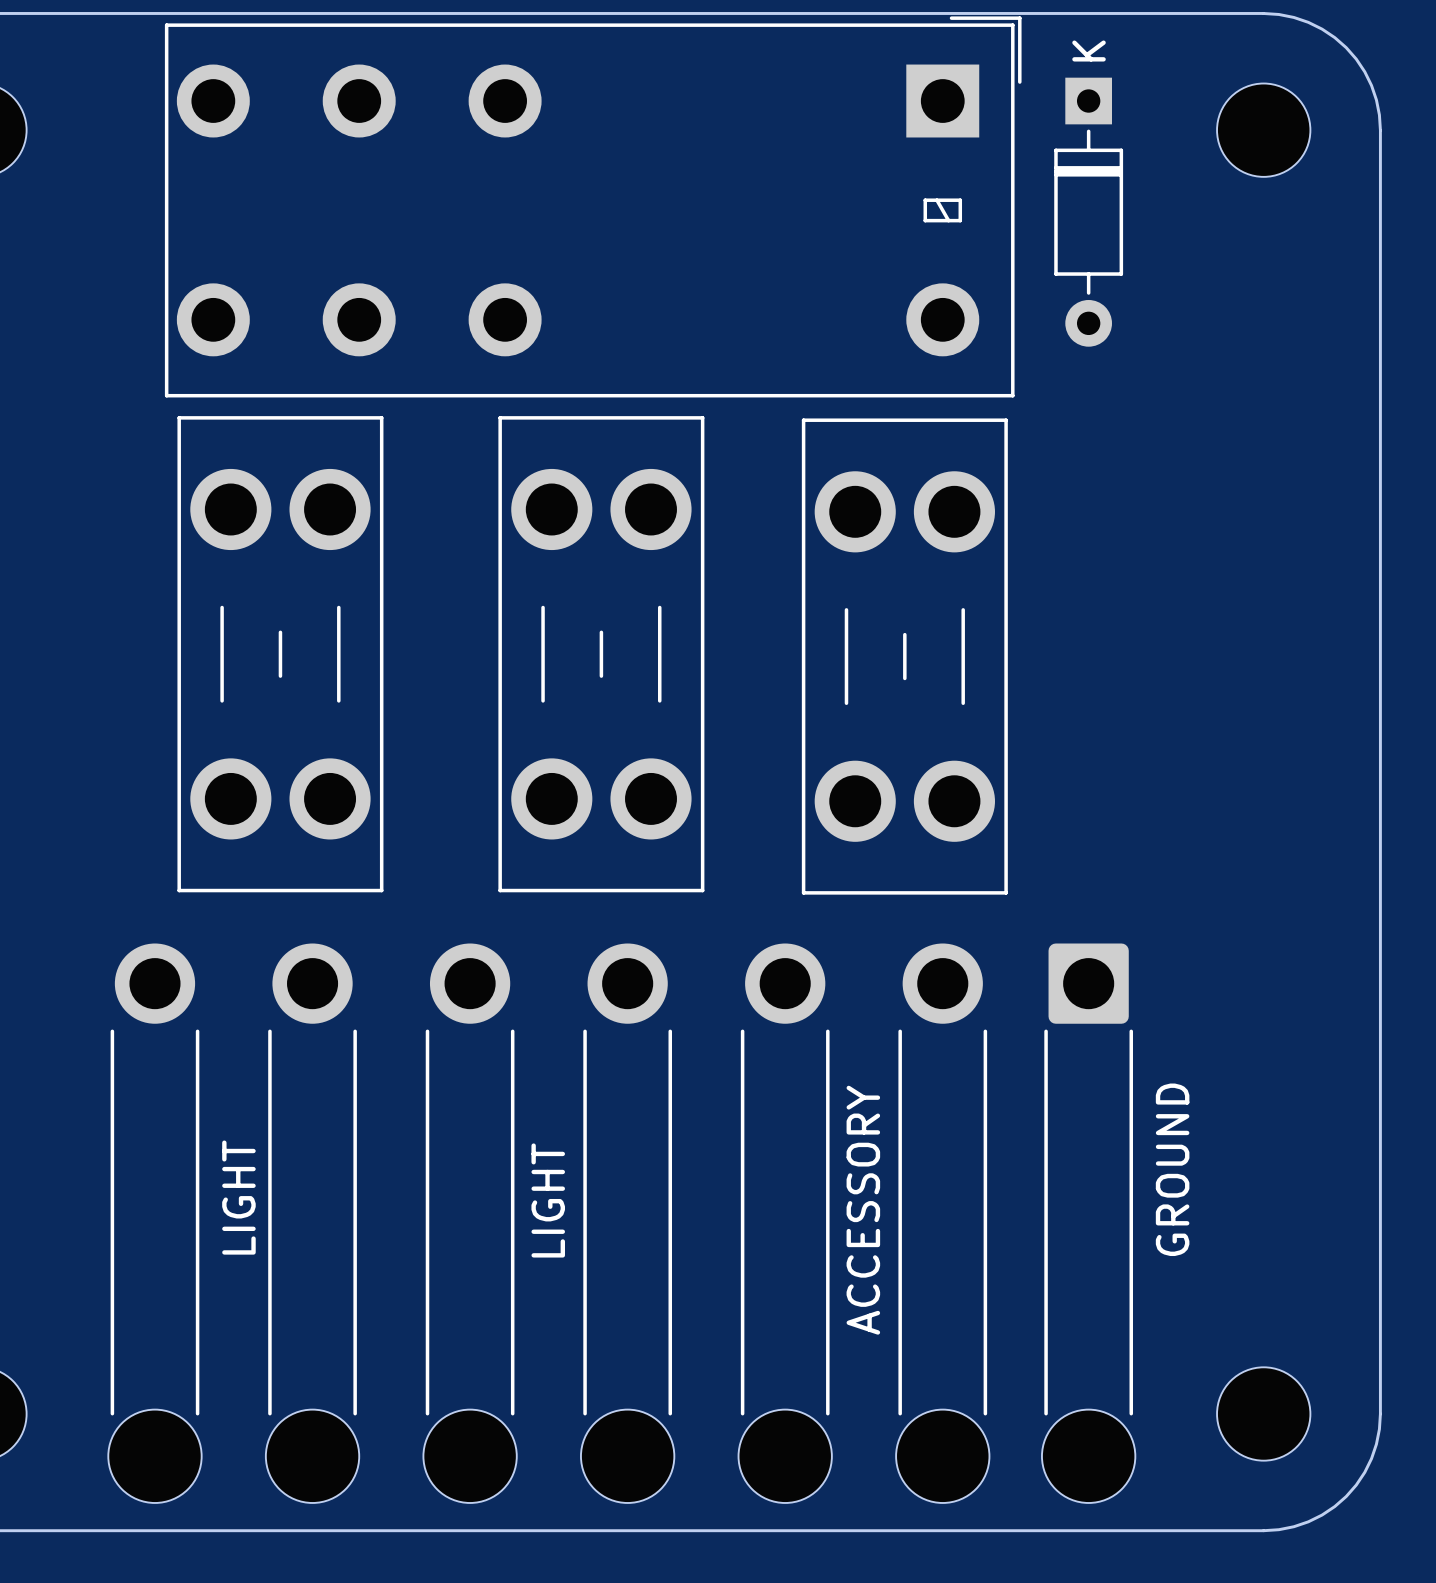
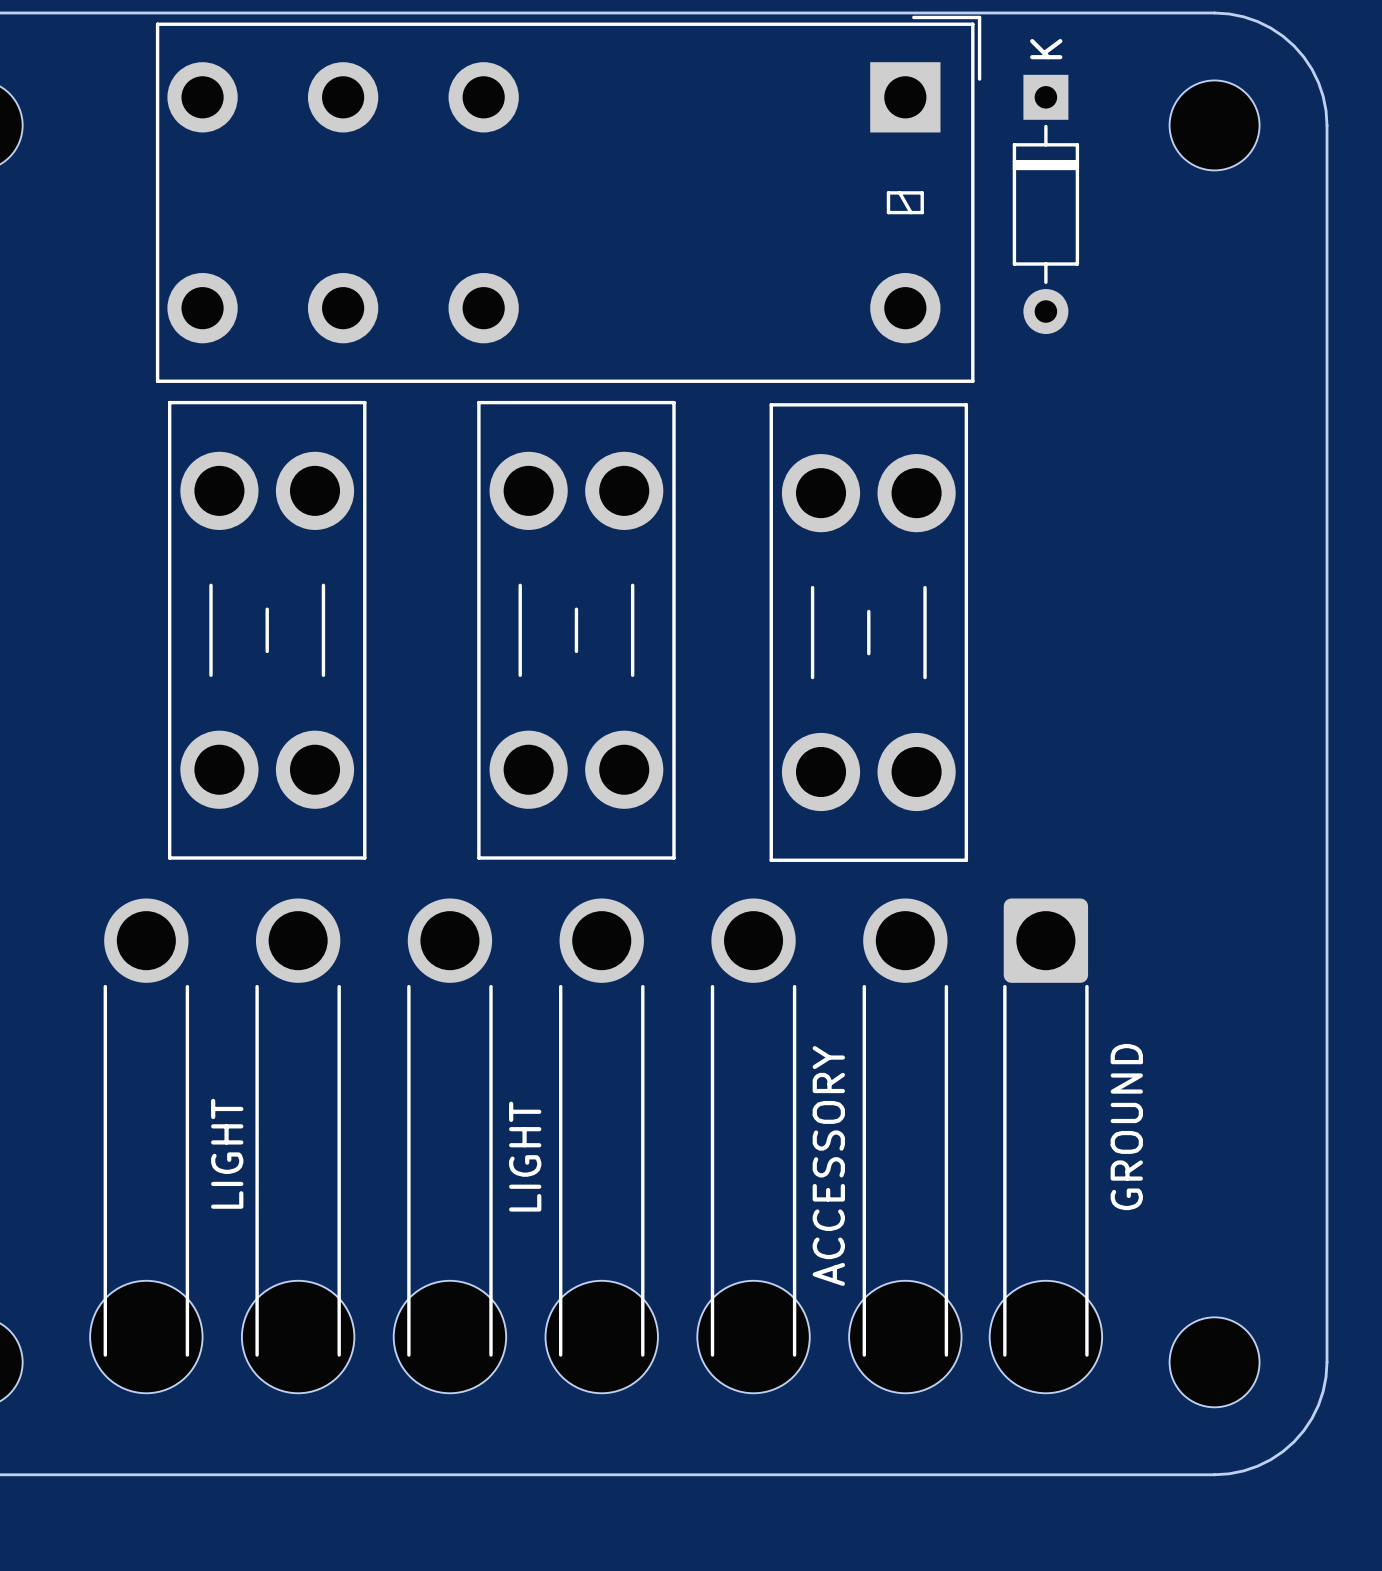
part: none -> (525, 1145)
part: none -> (1045, 1145)
part: (548, 1223) -> none
part: (1088, 1223) -> none

